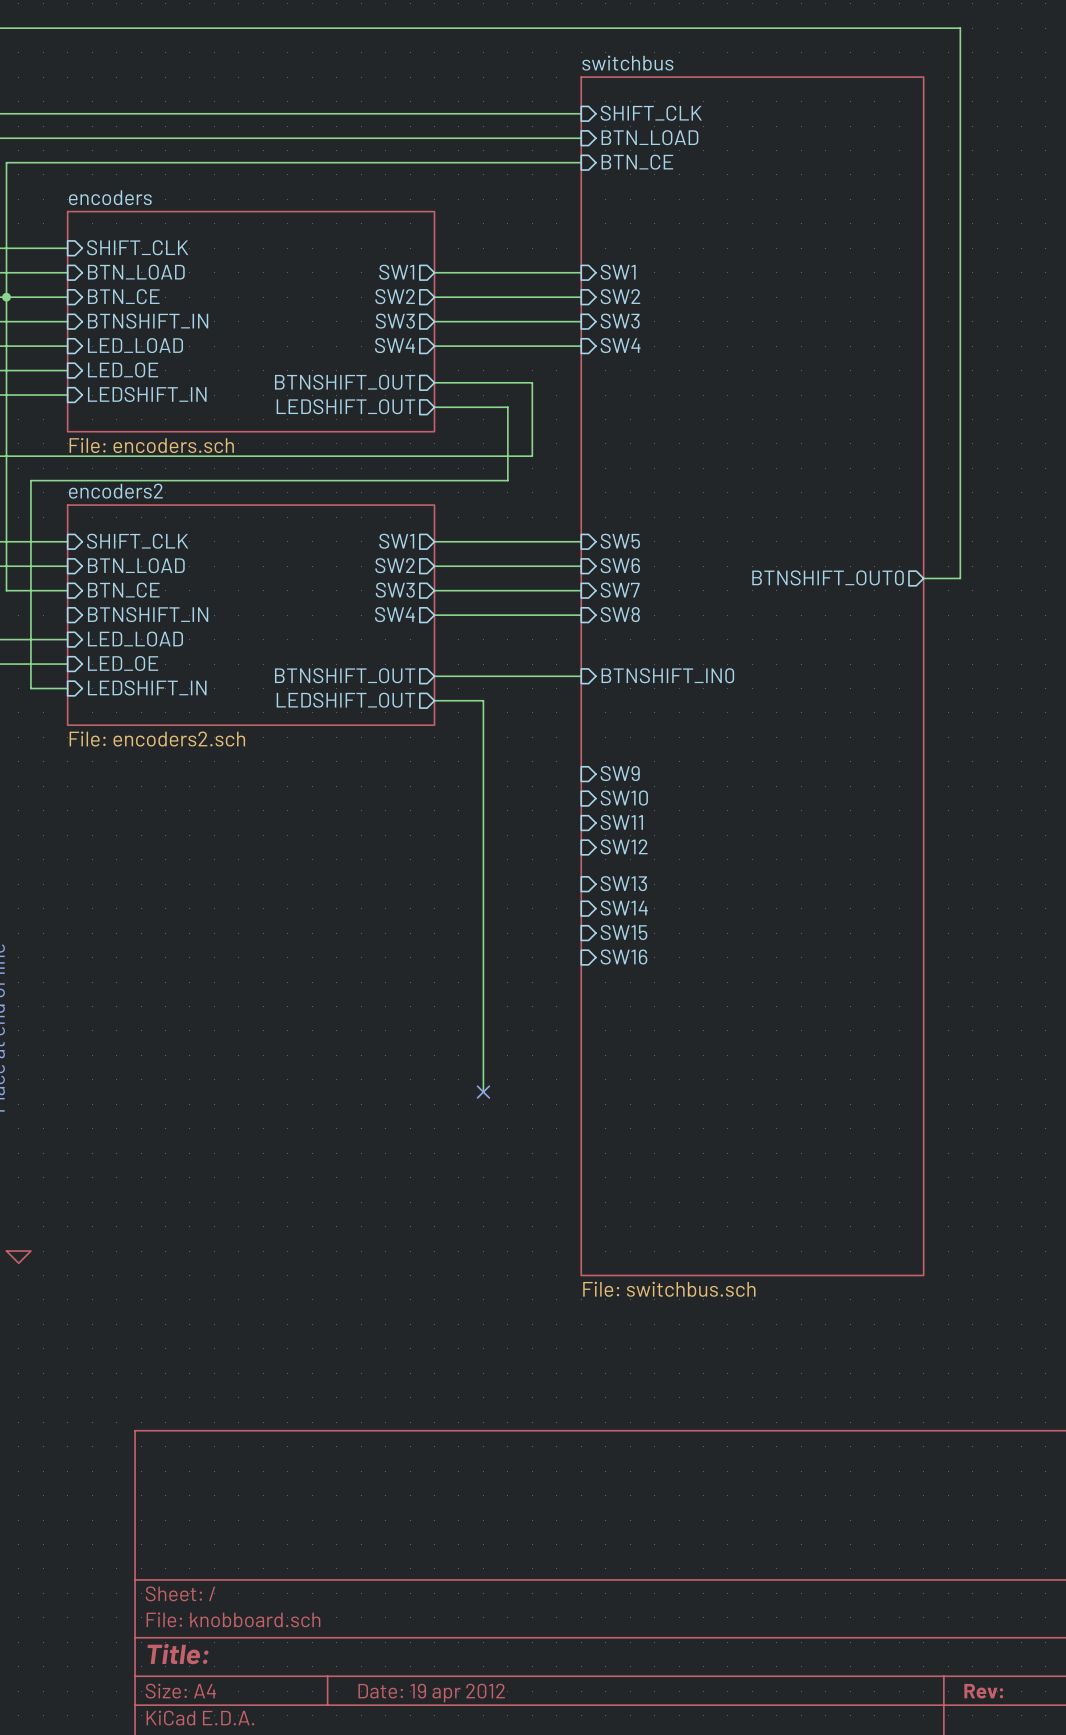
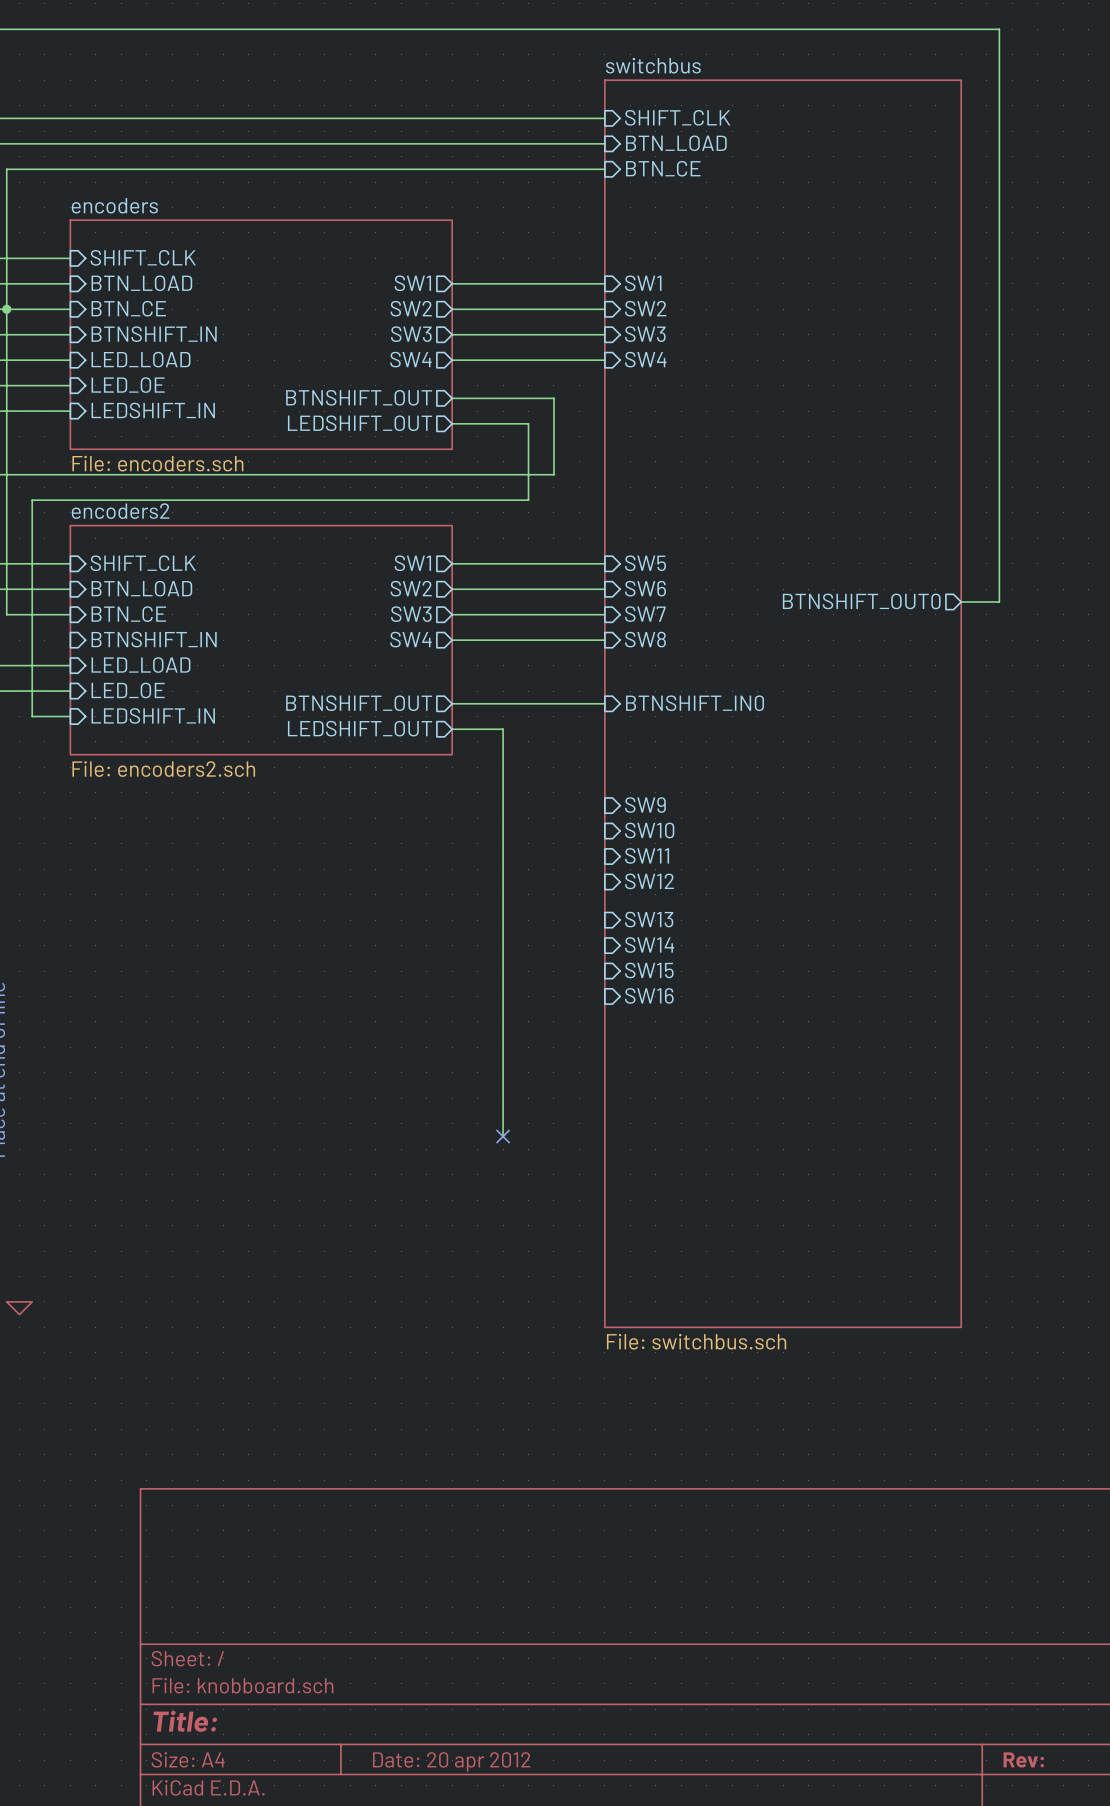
title block: Date: 19 apr 2012 (431, 1693) -> Date: 20 apr 2012 (451, 1761)

